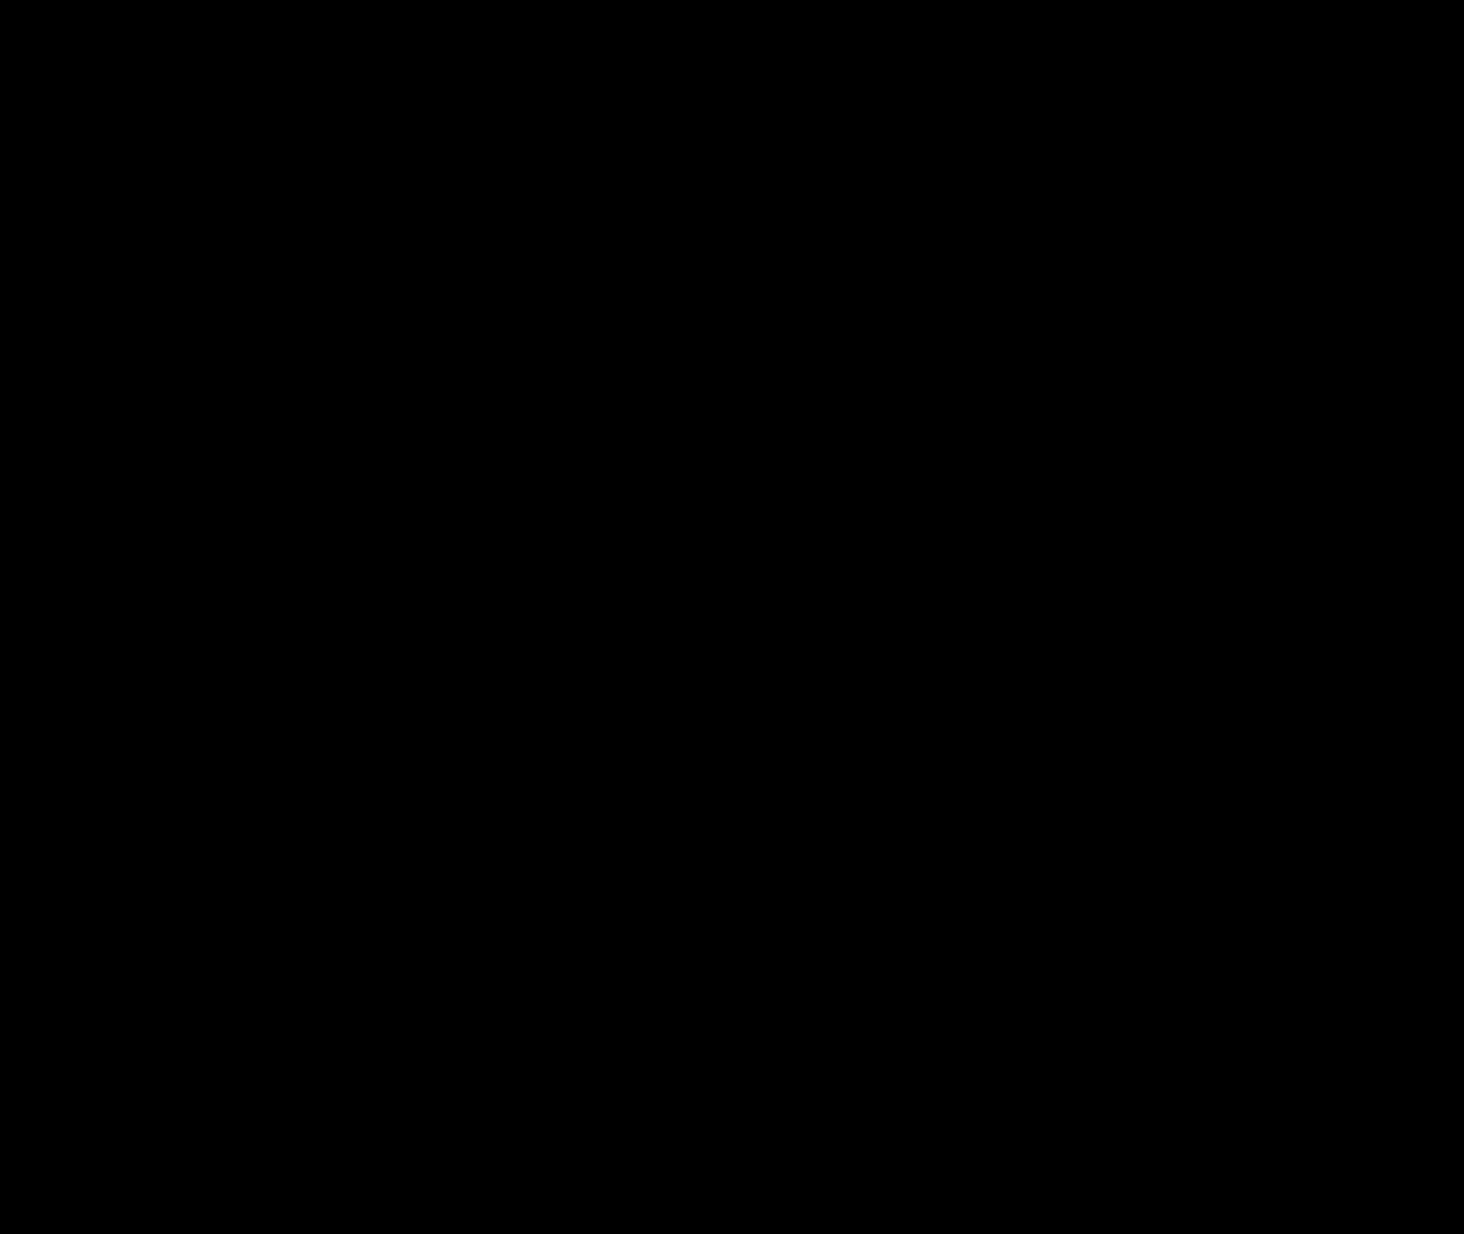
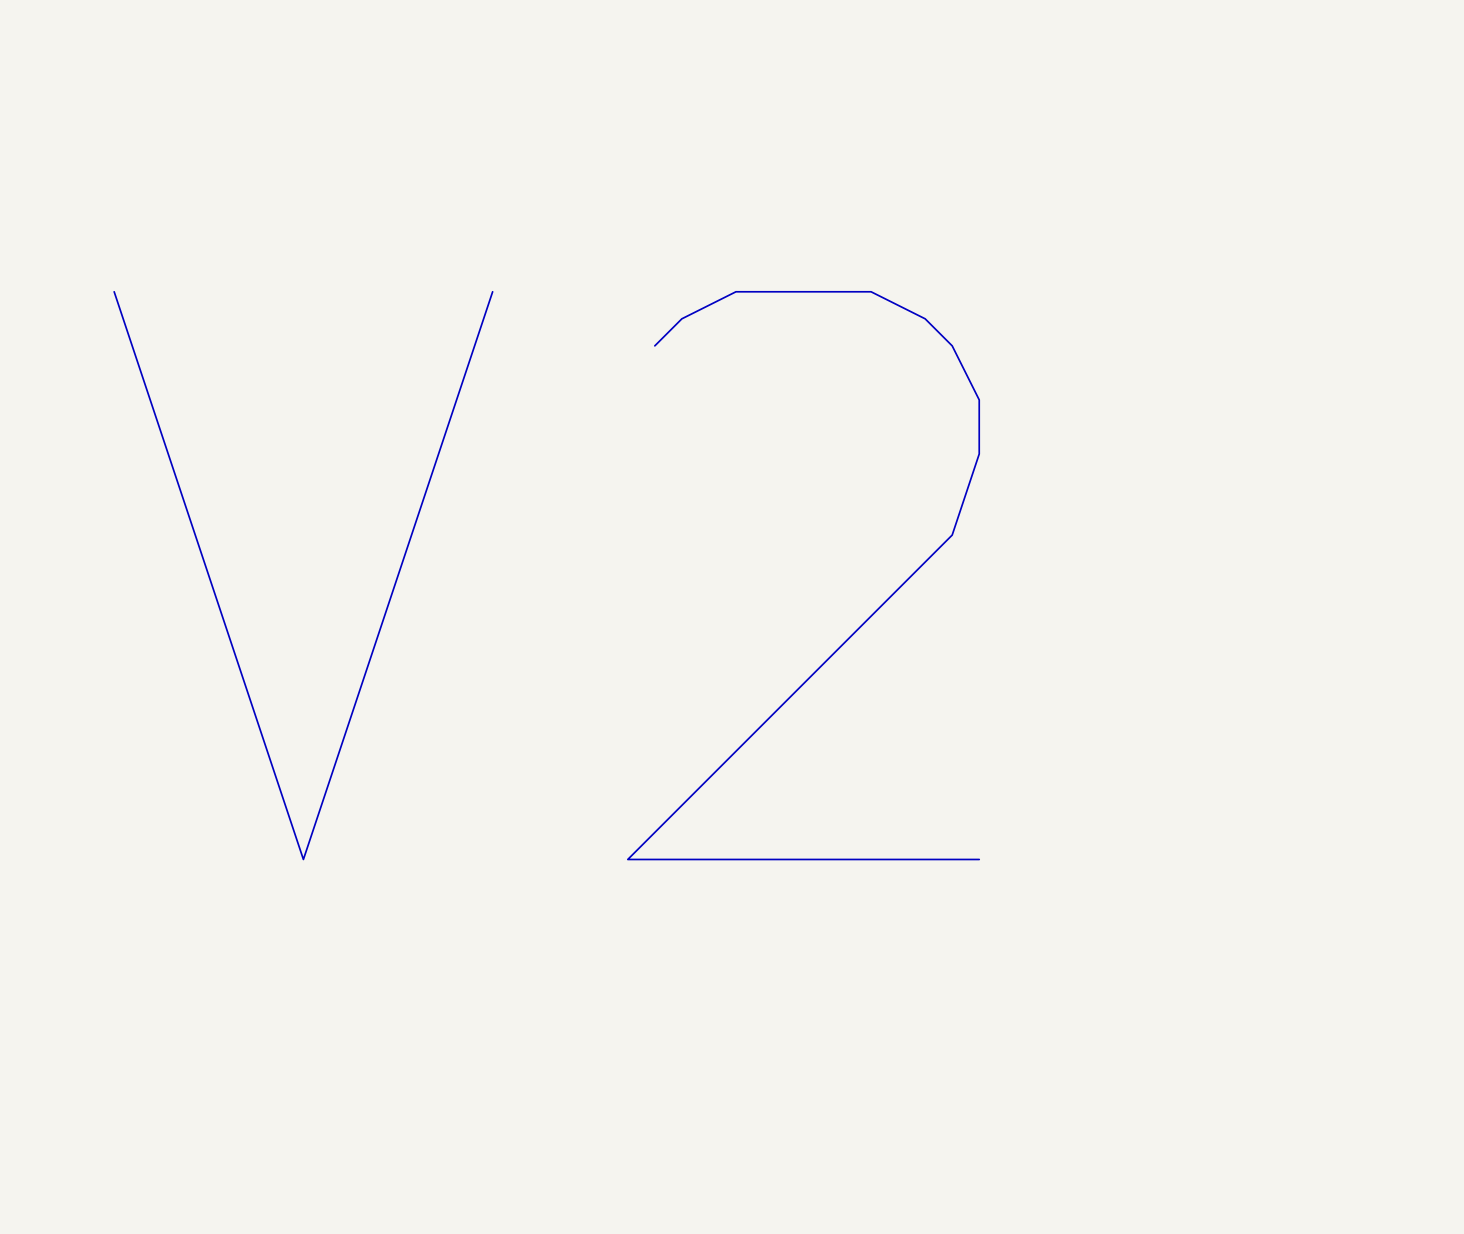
text: none -> V2 (546, 575)

